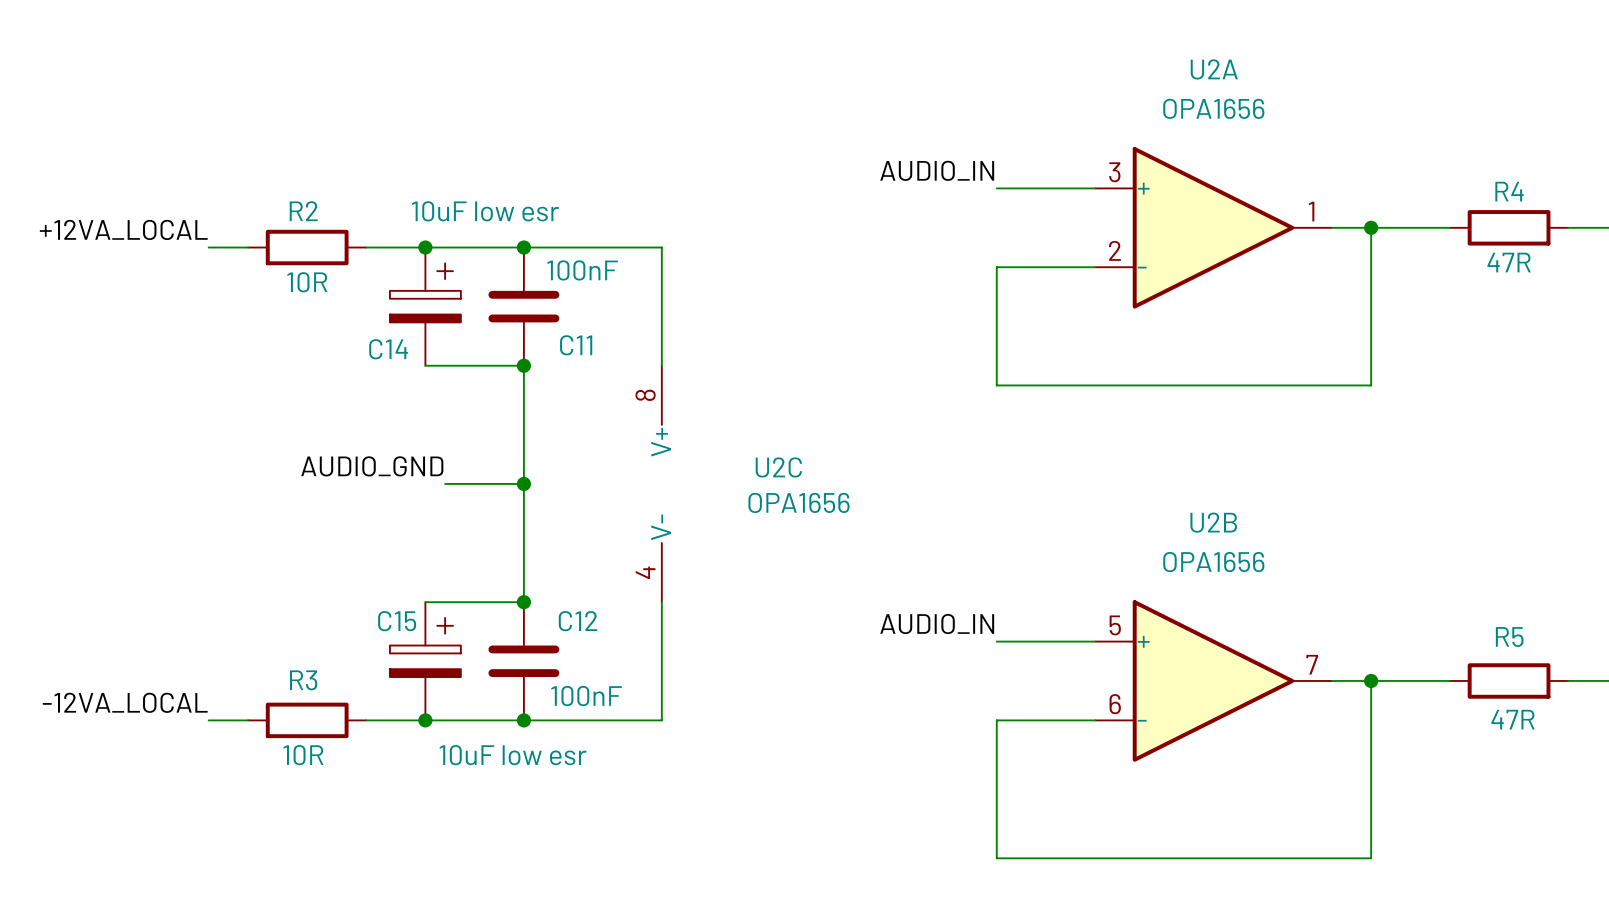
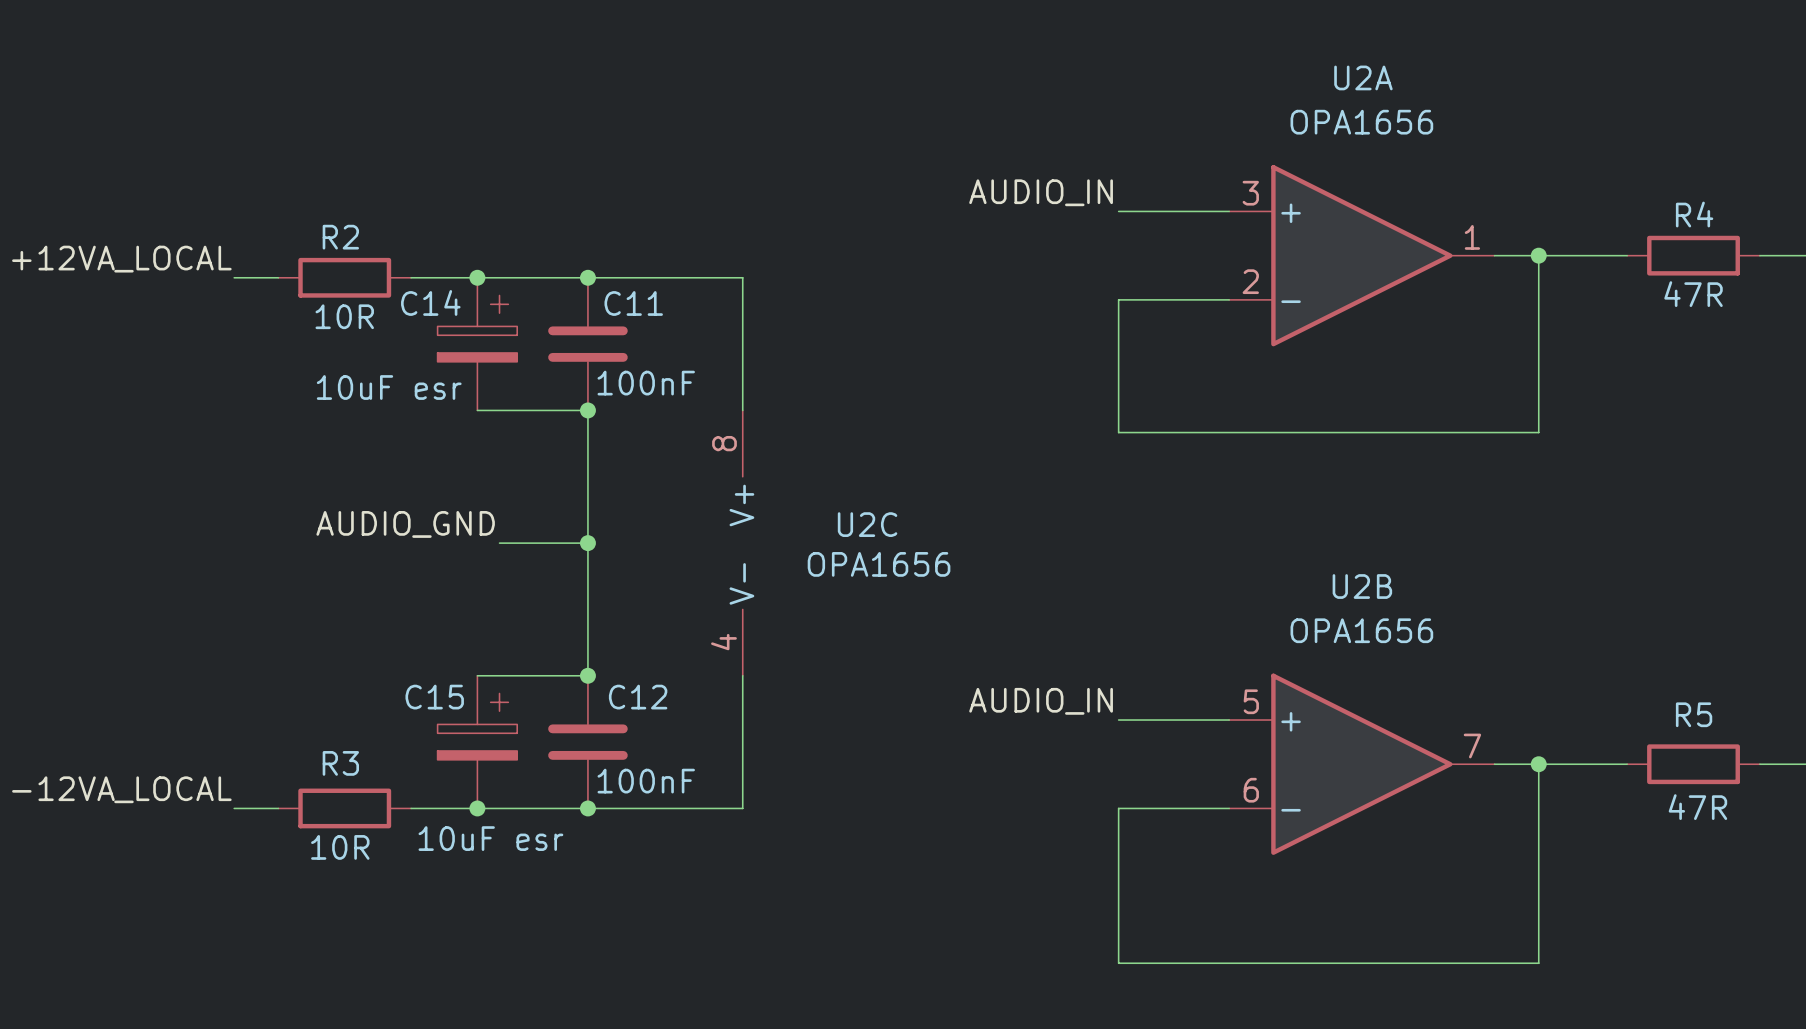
C14 value: 10uF low esr (485, 211) -> 10uF esr (389, 387)
C11 value position: 100nF (582, 270) -> 100nF (646, 383)
C11 name position: C11 (576, 345) -> C11 (633, 303)
C14 name position: C14 (388, 349) -> C14 (430, 302)
C15 value: 10uF low esr (513, 755) -> 10uF esr (490, 838)

